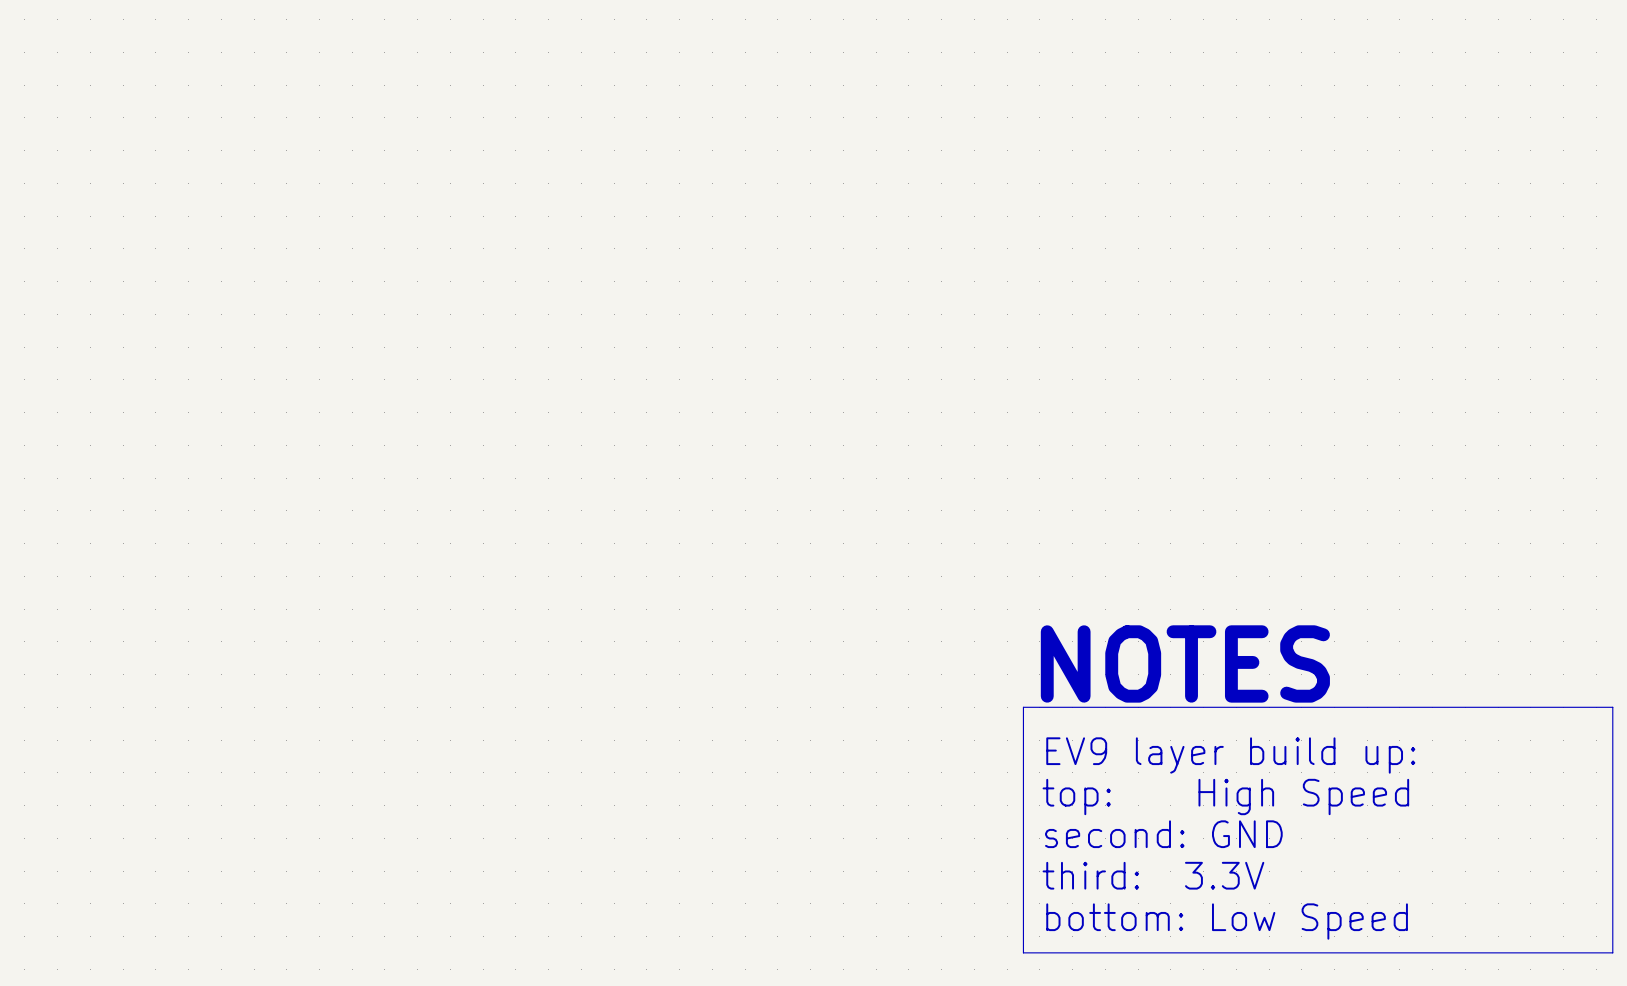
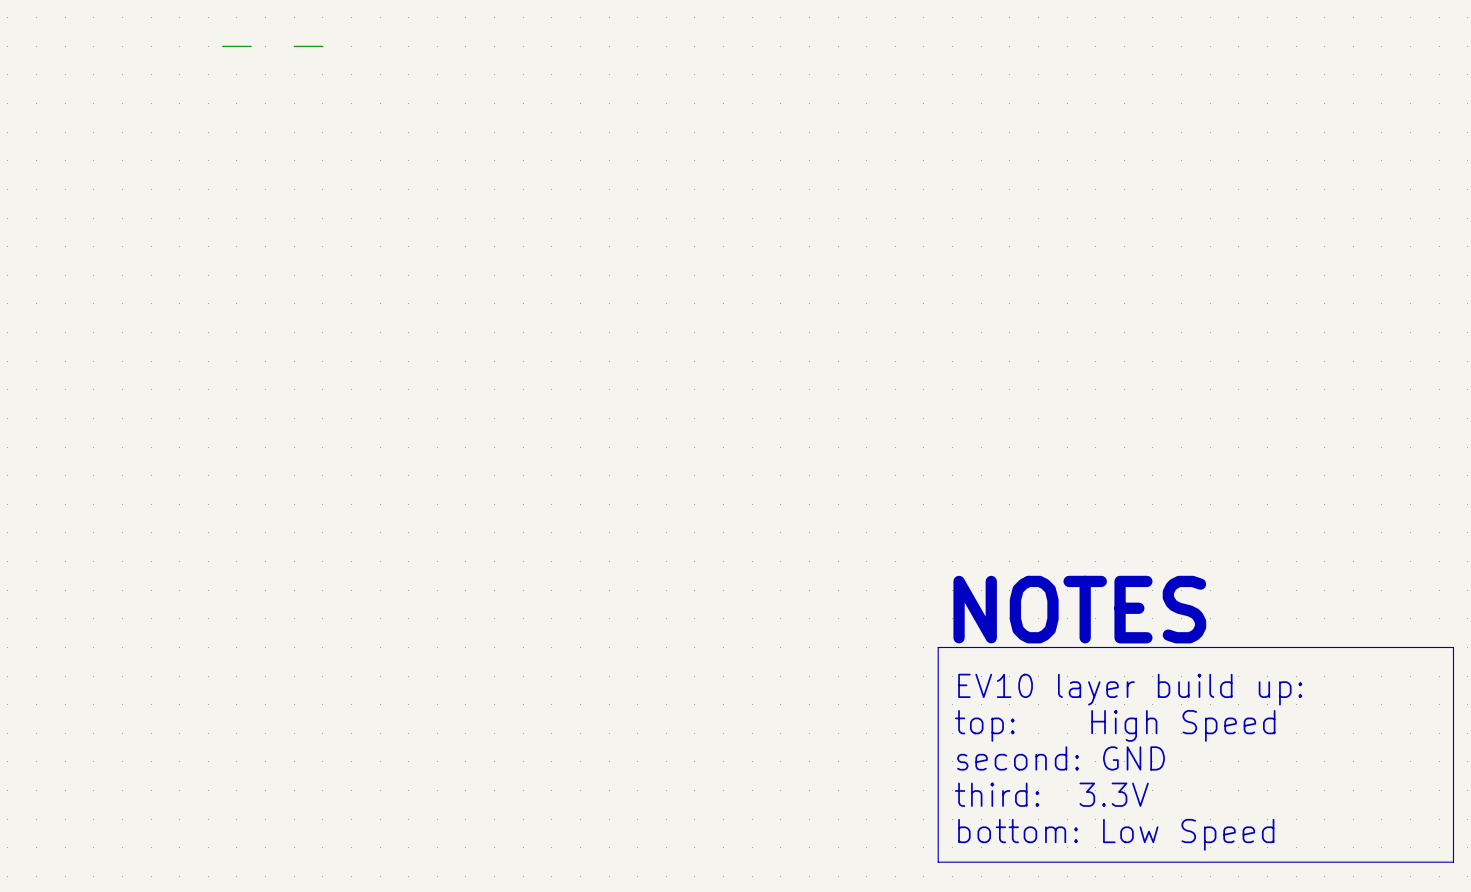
wire: none -> (222, 46) (251, 46)
wire: none -> (294, 46) (322, 46)
text: EV9 layer build up: (1230, 755) -> EV10 layer build up: (1130, 689)

